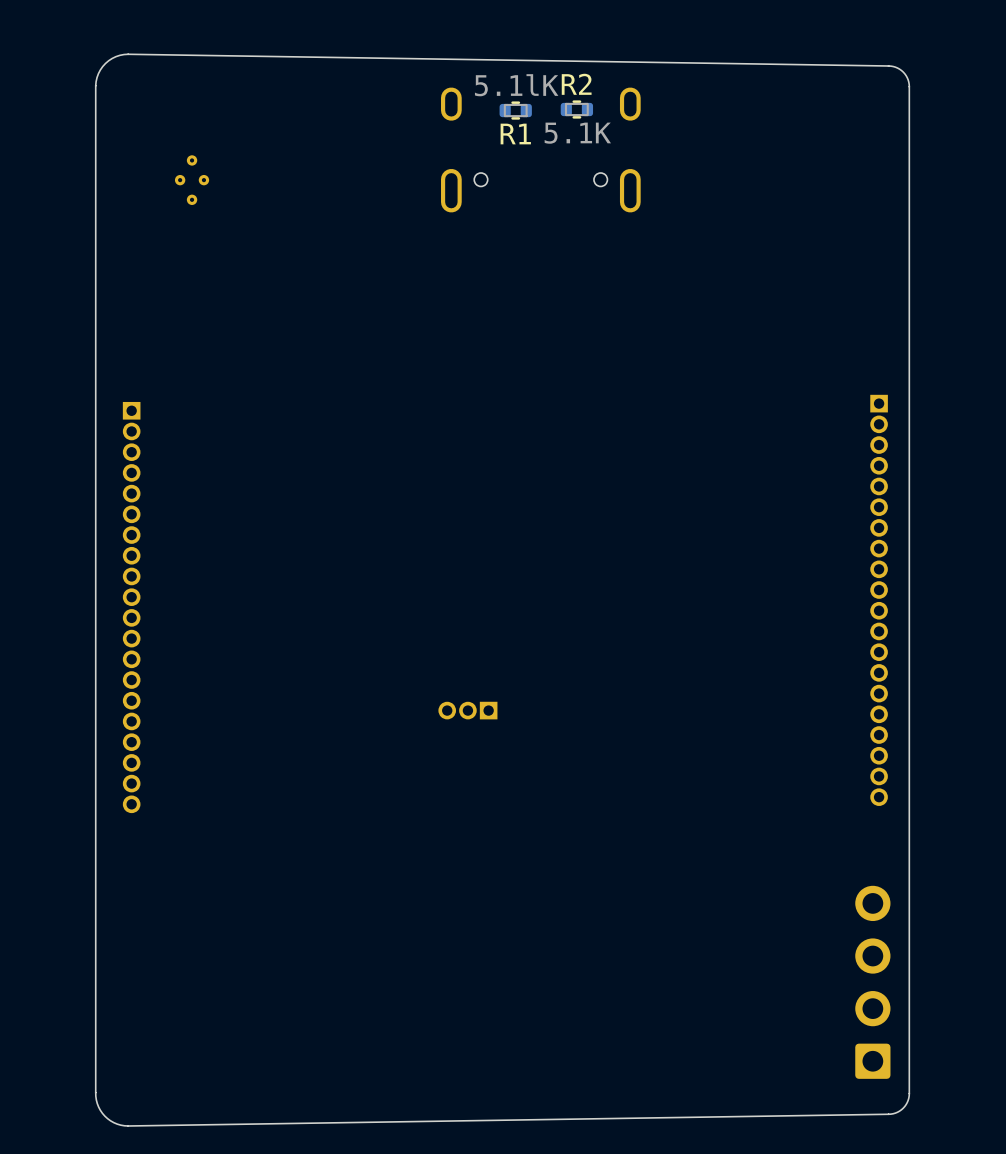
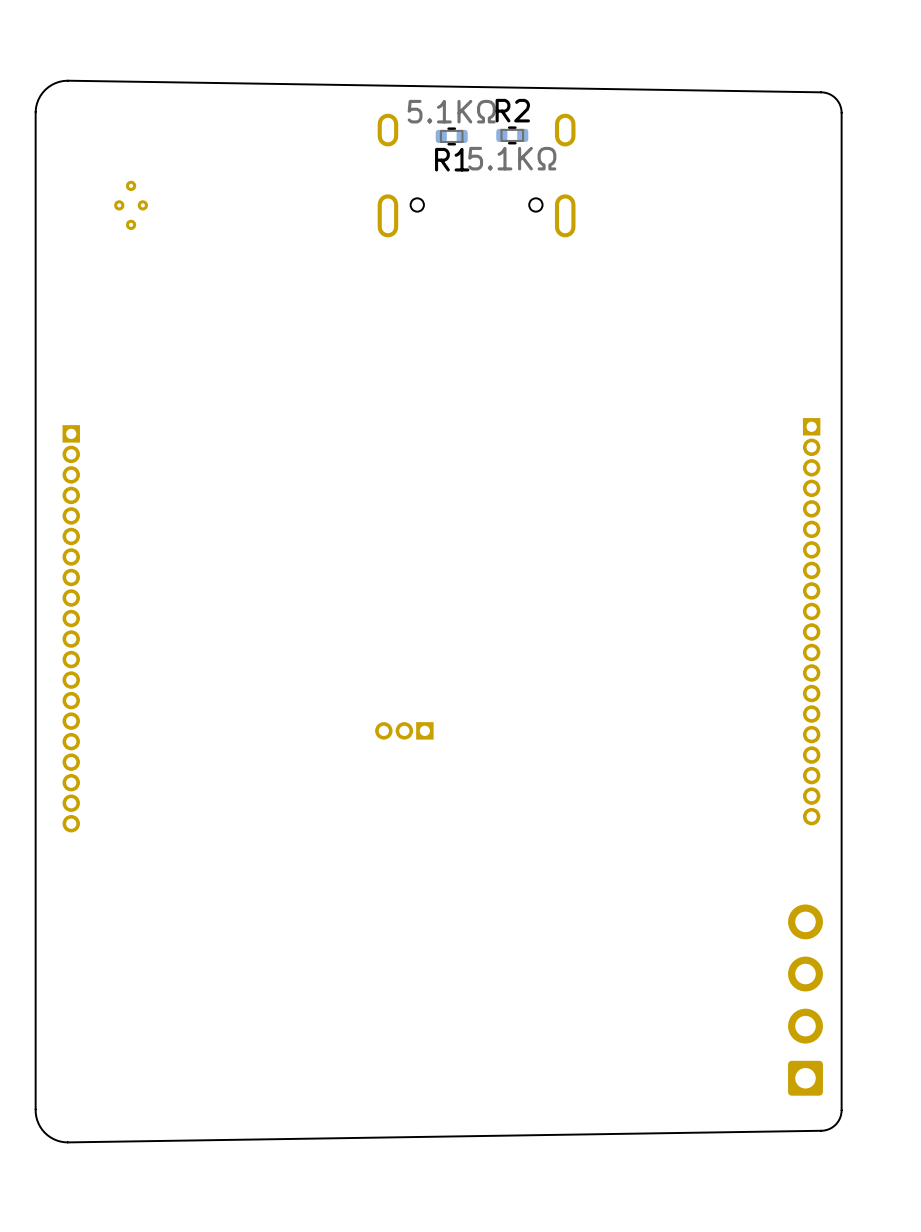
R1 value: 5.1lK (516, 85) -> 5.1KΩ (451, 111)
R2 value: 5.1K (577, 133) -> 5.1KΩ (512, 158)

